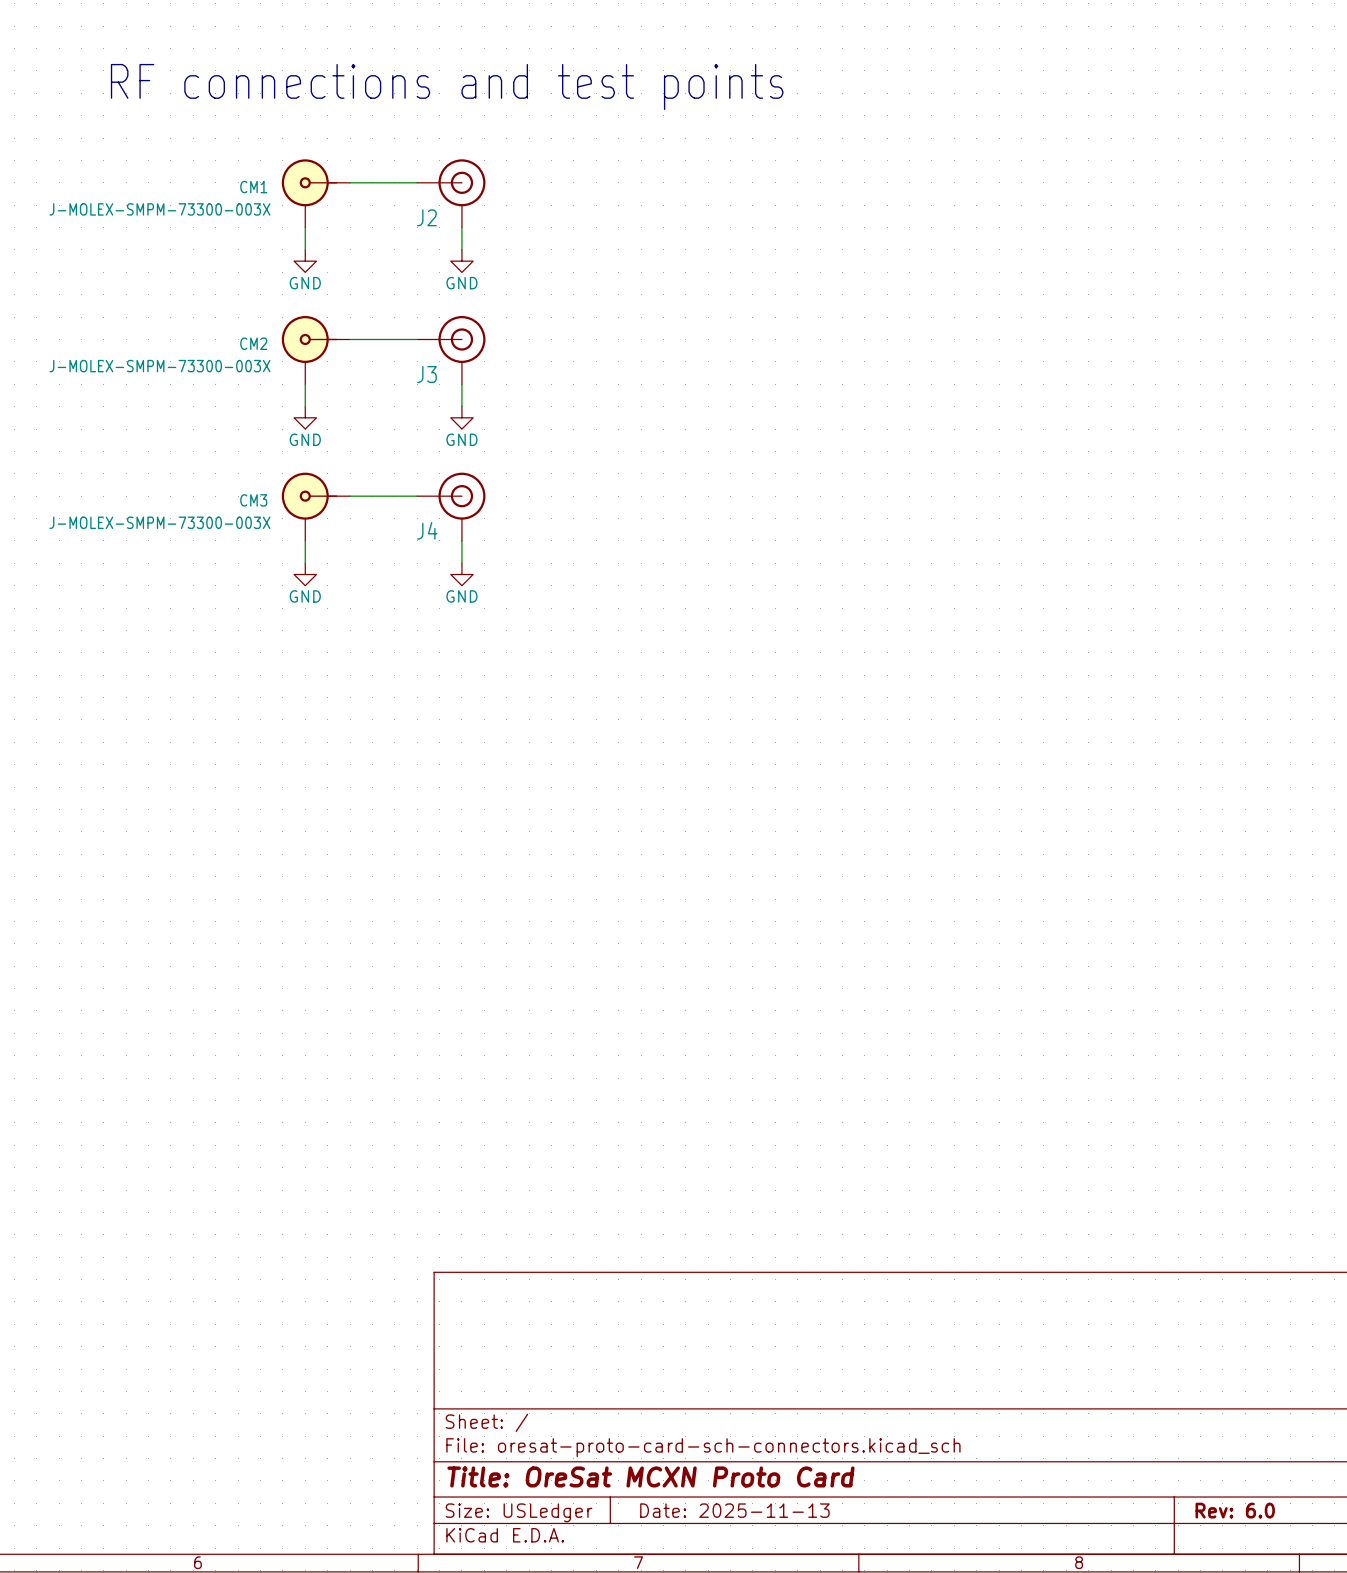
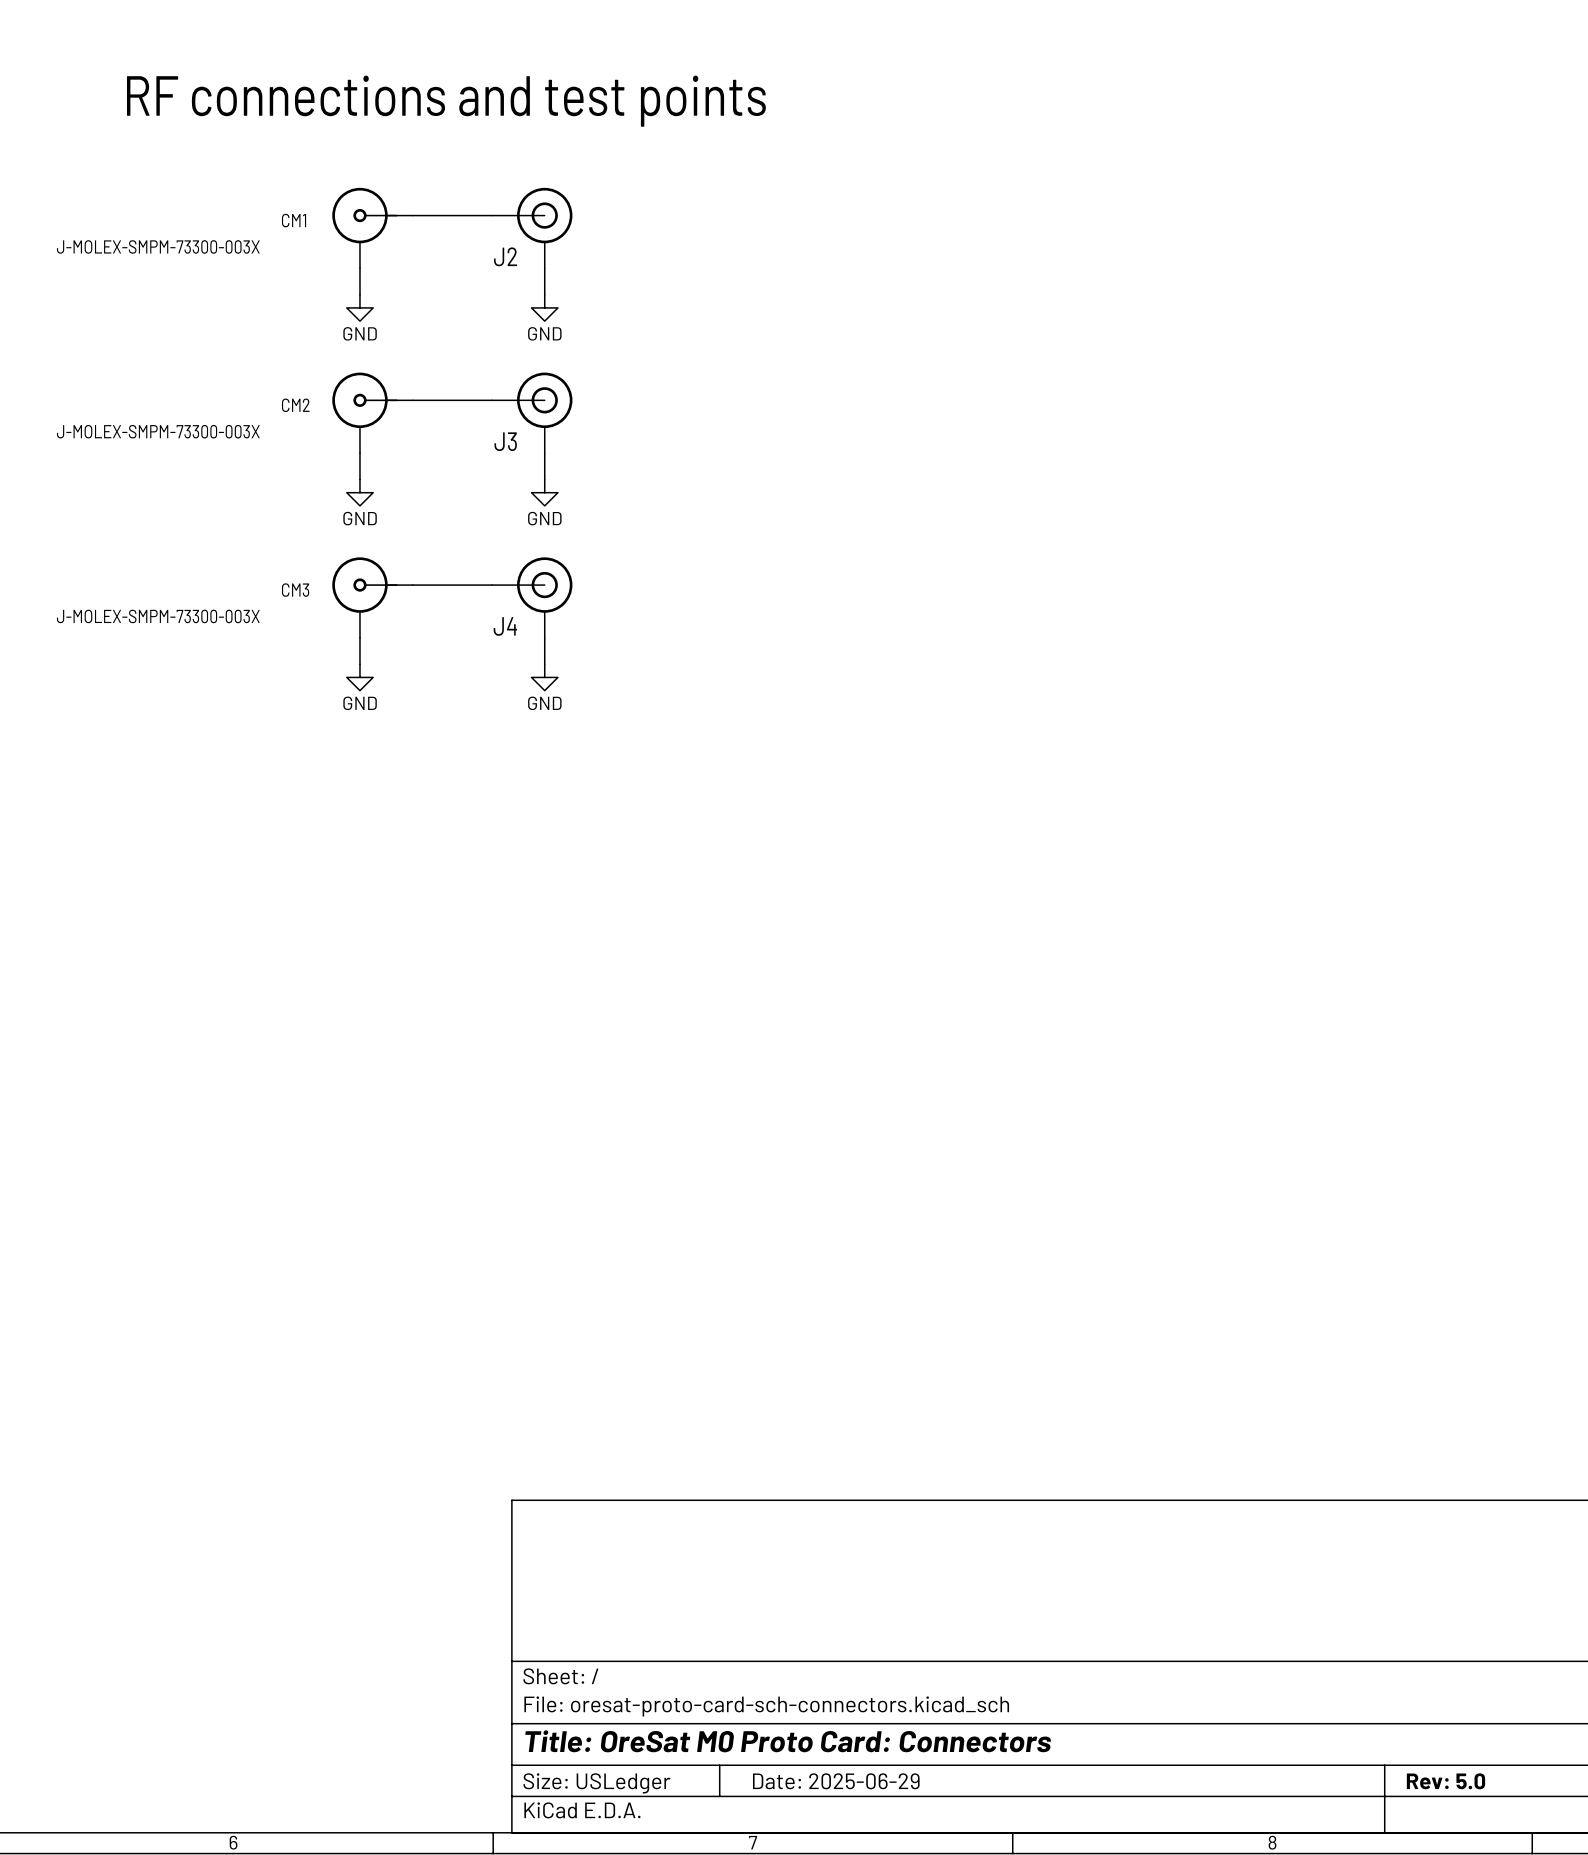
title block: Title: OreSat MCXN Proto Card (650, 1476) -> Title: OreSat M0 Proto Card: Connectors (788, 1741)
title block: Date: 2025-11-13 (734, 1510) -> Date: 2025-06-29 (836, 1781)
title block: Rev: 6.0 (1235, 1510) -> Rev: 5.0 (1445, 1781)

